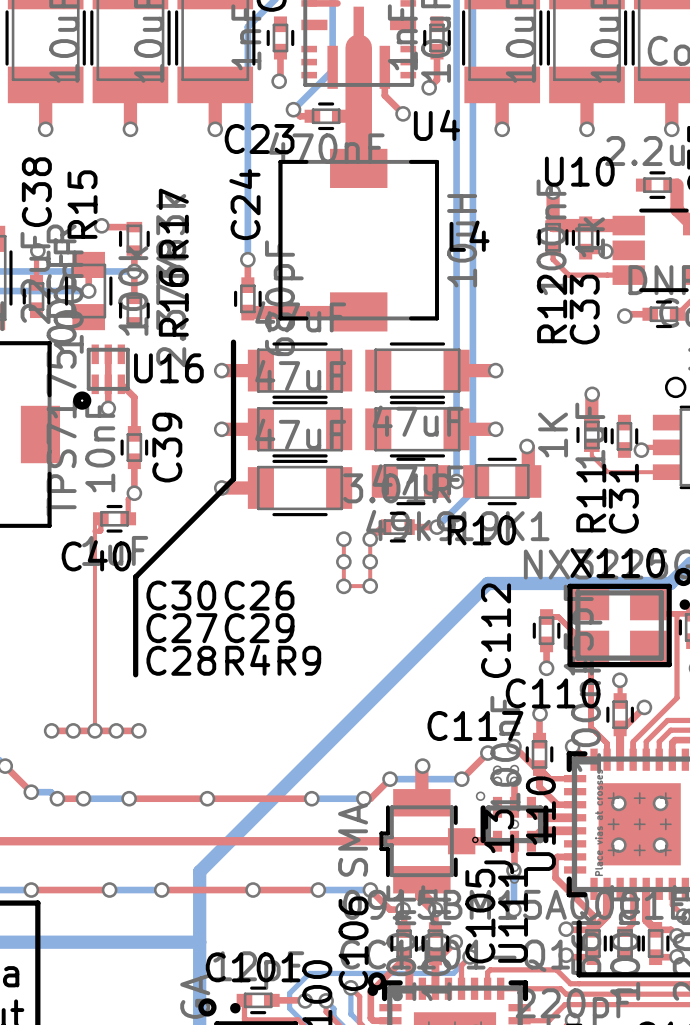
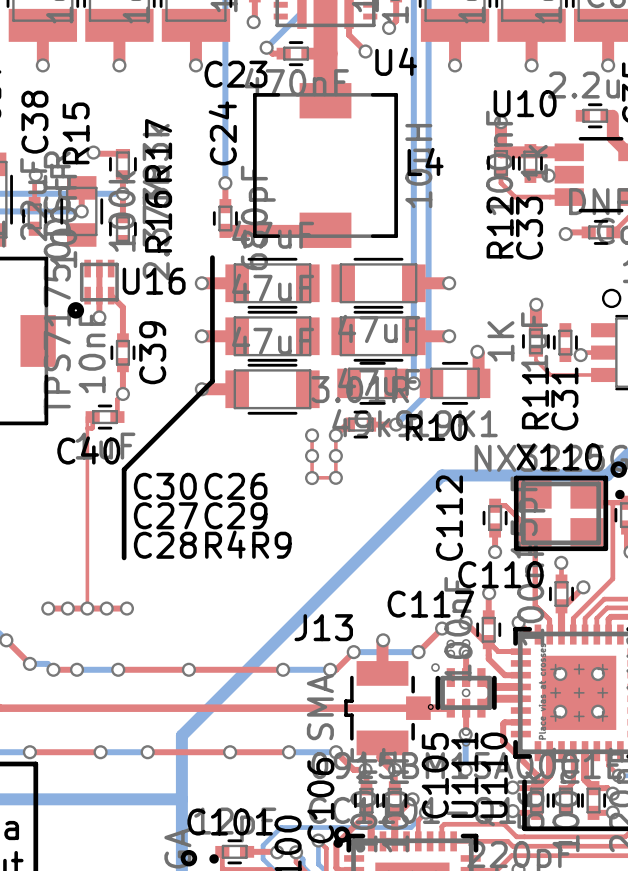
J13 footprint: [379, 789, 476, 894] -> [344, 661, 431, 756]
U110 name position: U110 (540, 823) -> U110 (494, 775)
J13 name position: J13 (499, 841) -> J13 (323, 627)

